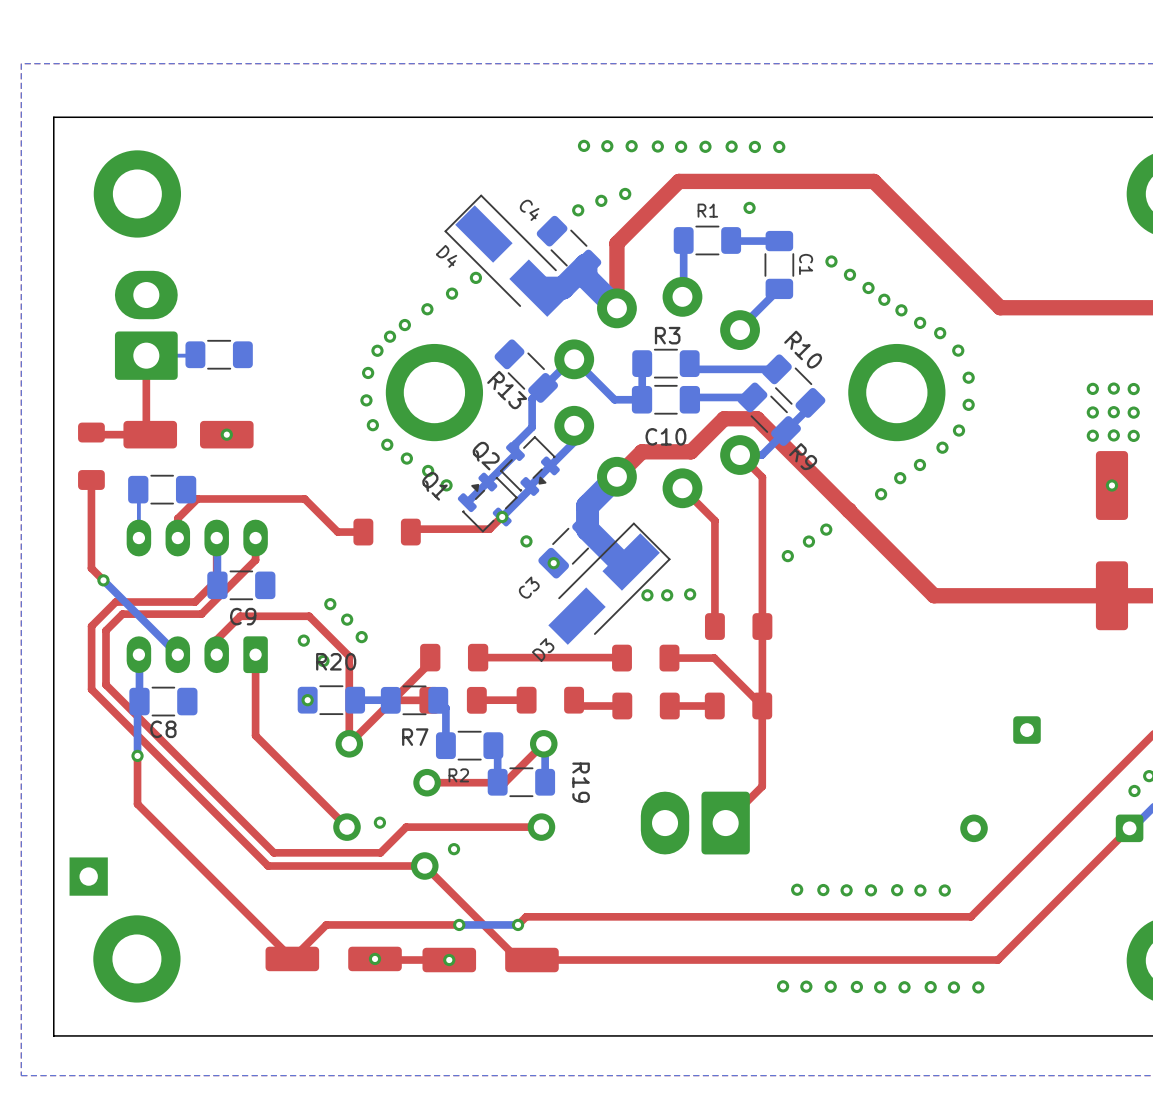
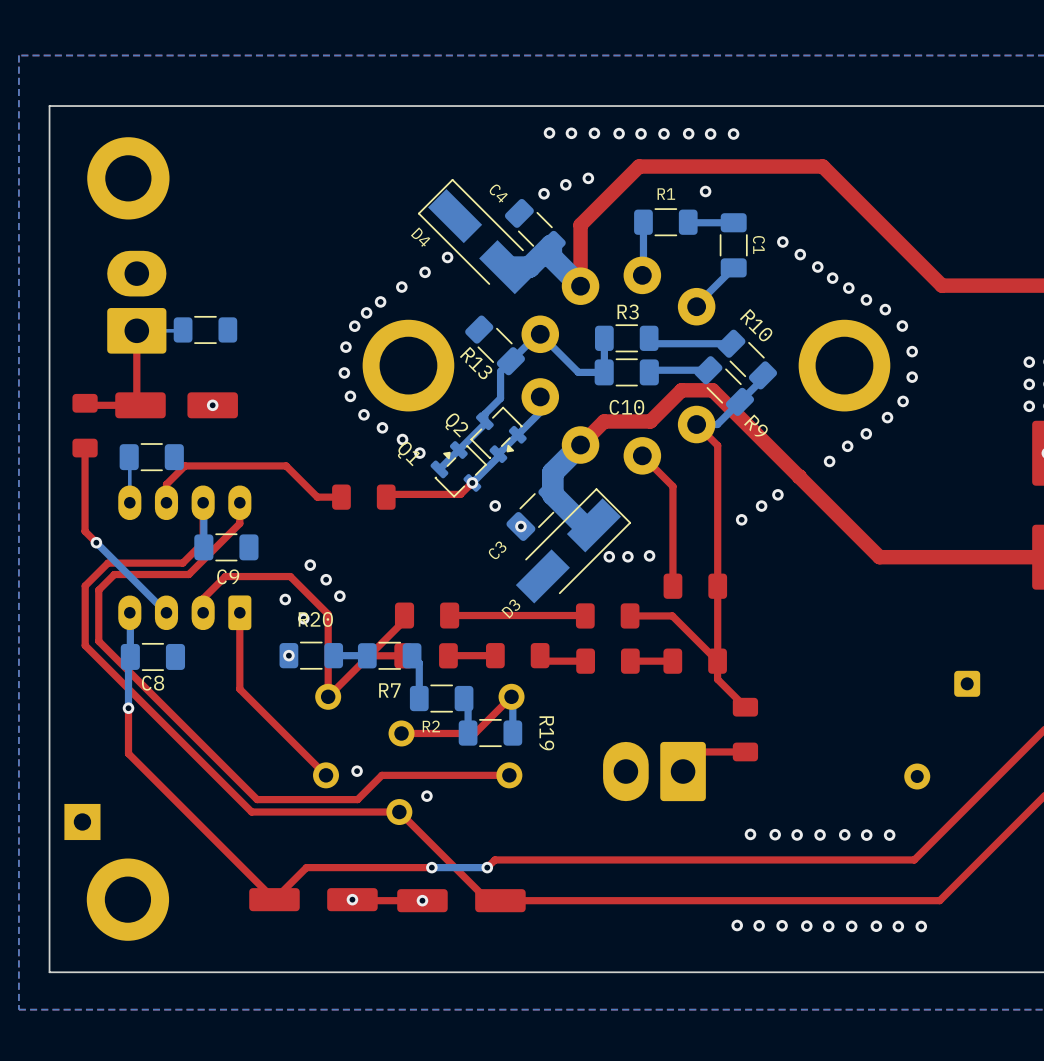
top track: (762, 725) (762, 786) (746, 802) -> (717, 679) (745, 707)
part: none -> (745, 729)
top track: none -> (745, 751) (702, 751)

